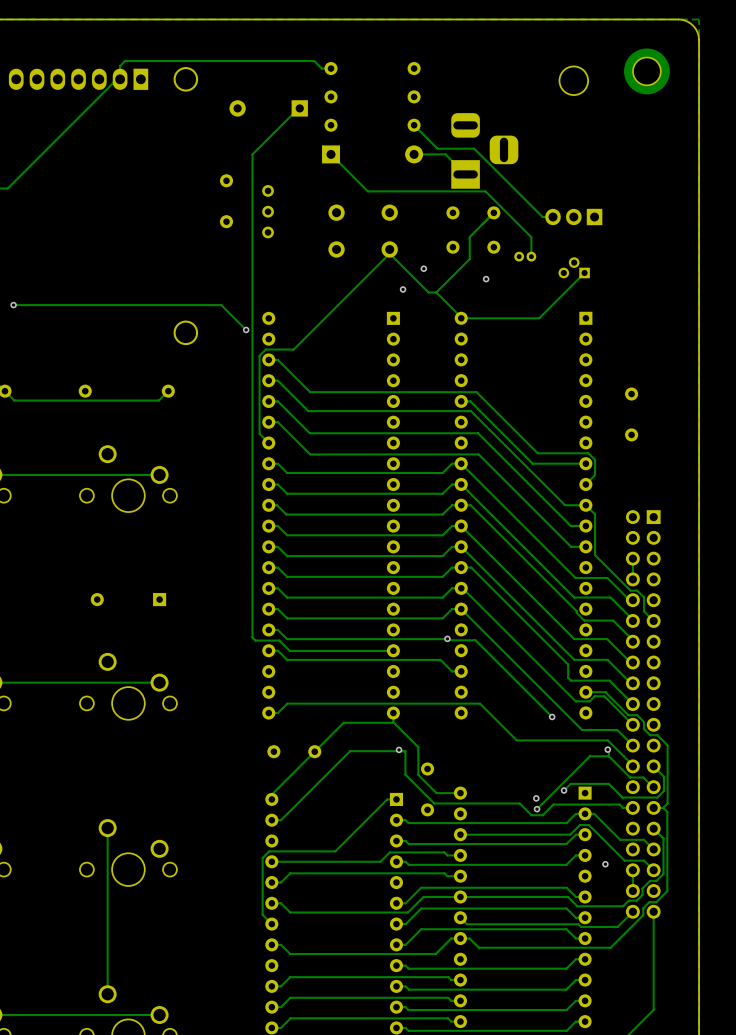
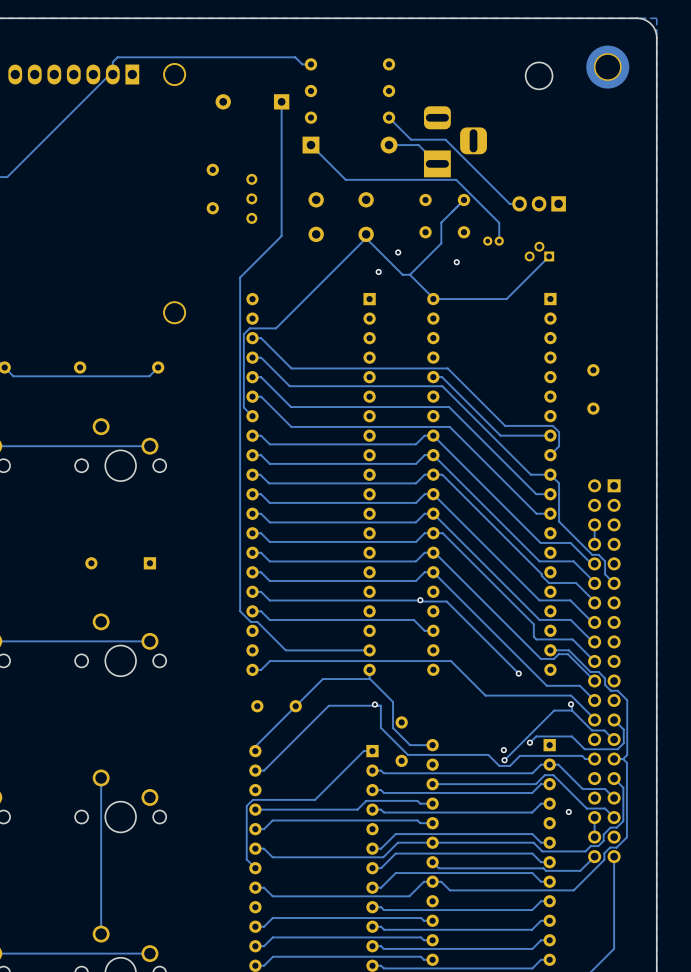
track: (299, 108) (252, 154) (252, 637) (255, 640) (279, 640) (289, 650) (393, 650) -> (281, 101) (281, 236) (240, 277) (240, 611) (250, 621) (257, 621) (285, 650) (369, 650)
track: (13, 305) (221, 305) (246, 329) -> none
via: (13, 305) -> none
via: (246, 329) -> none

